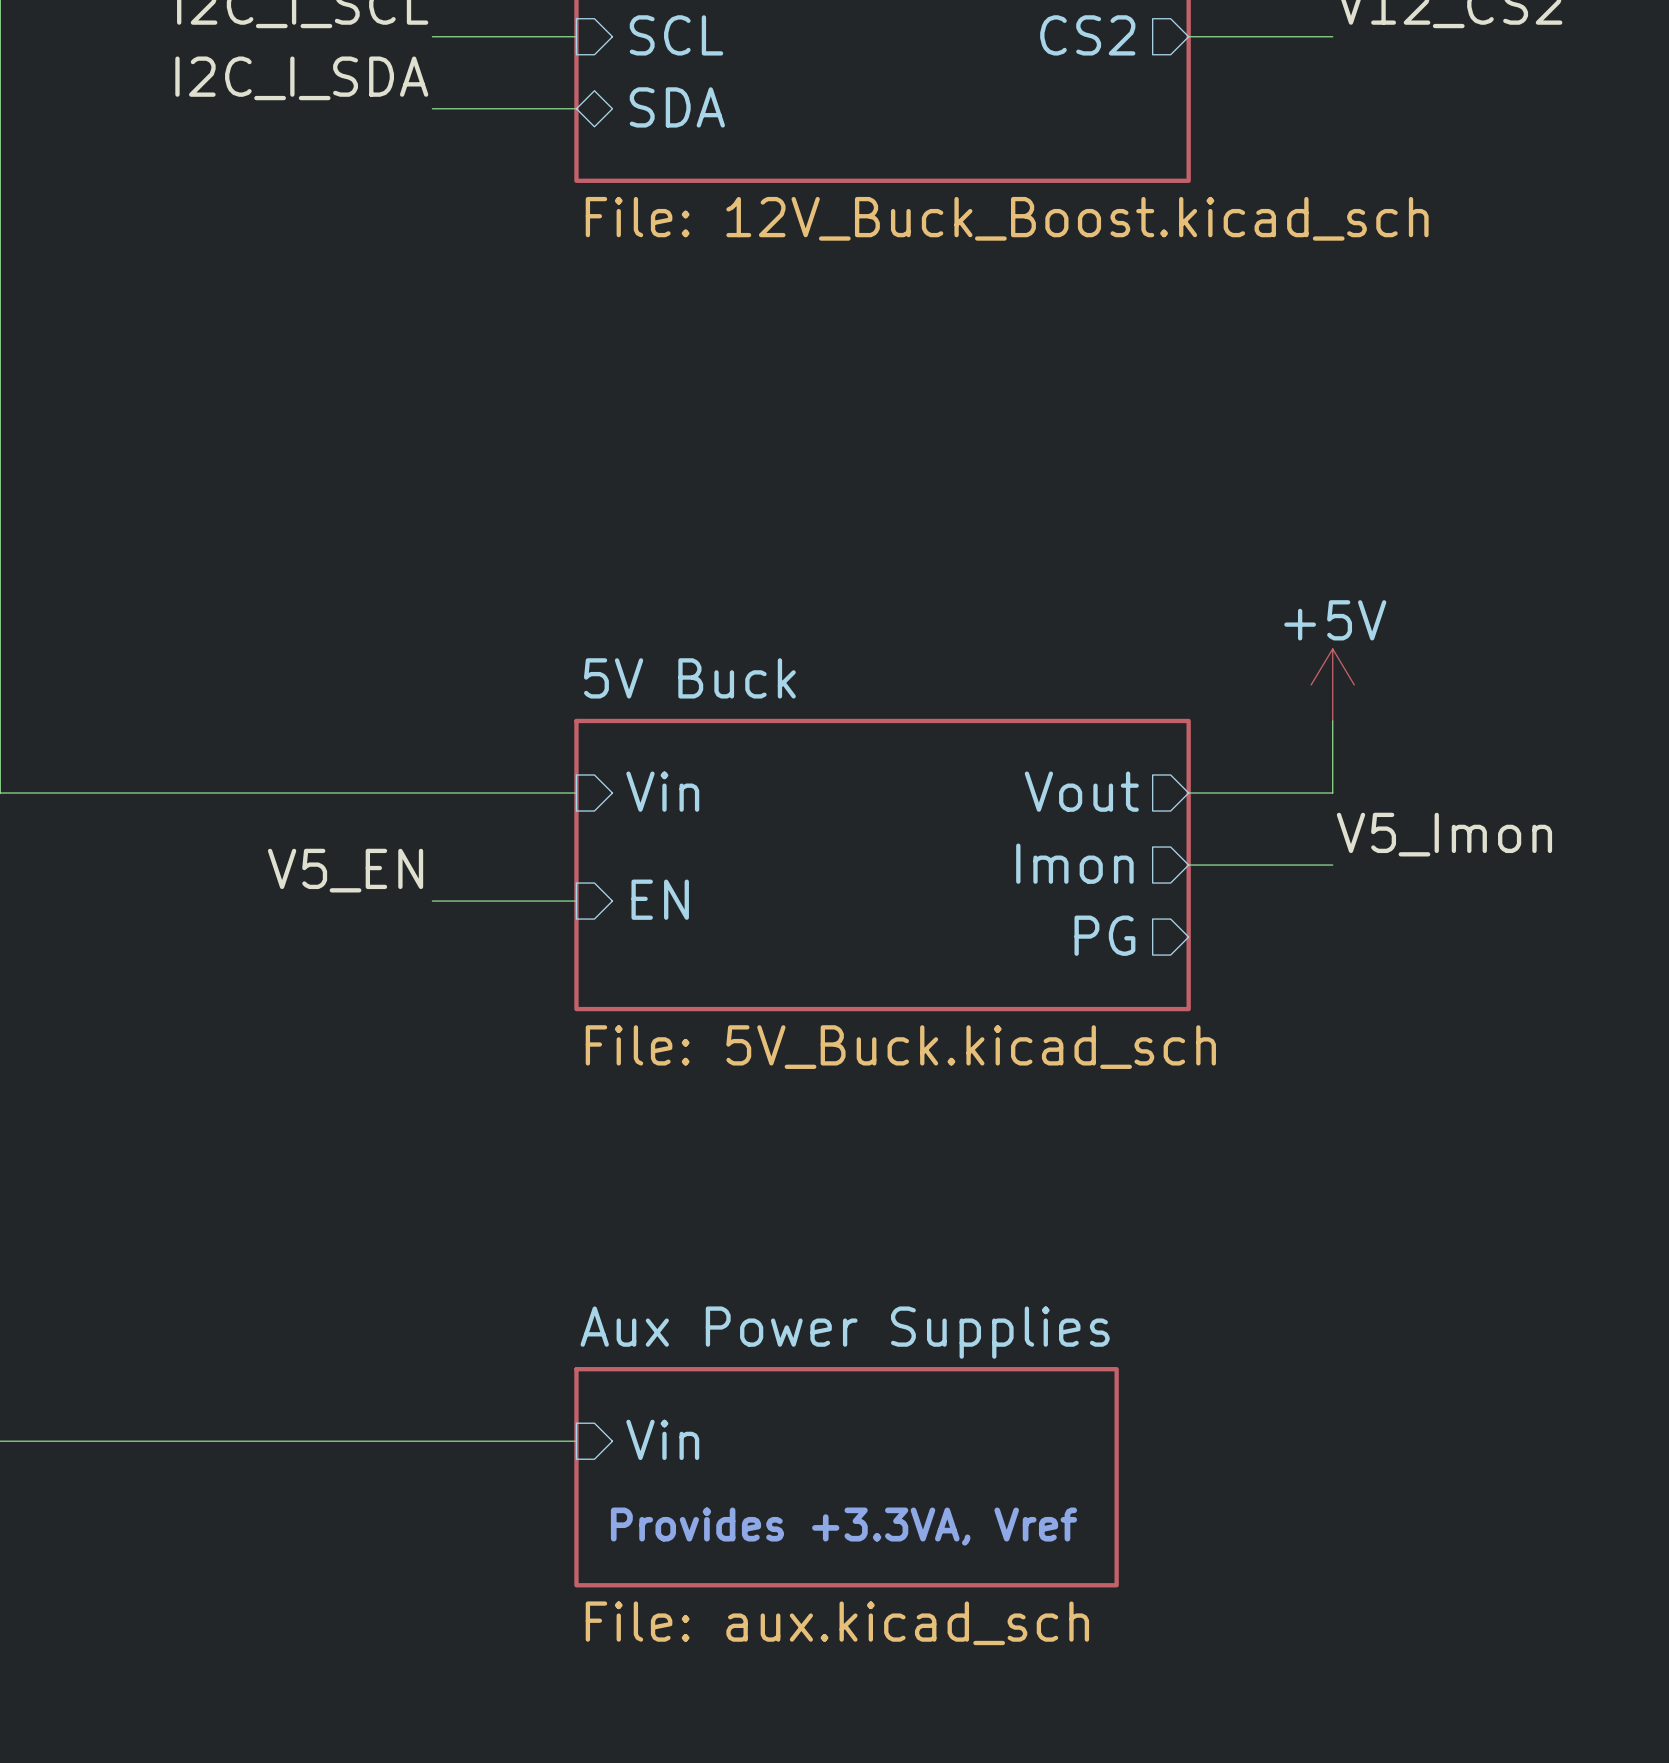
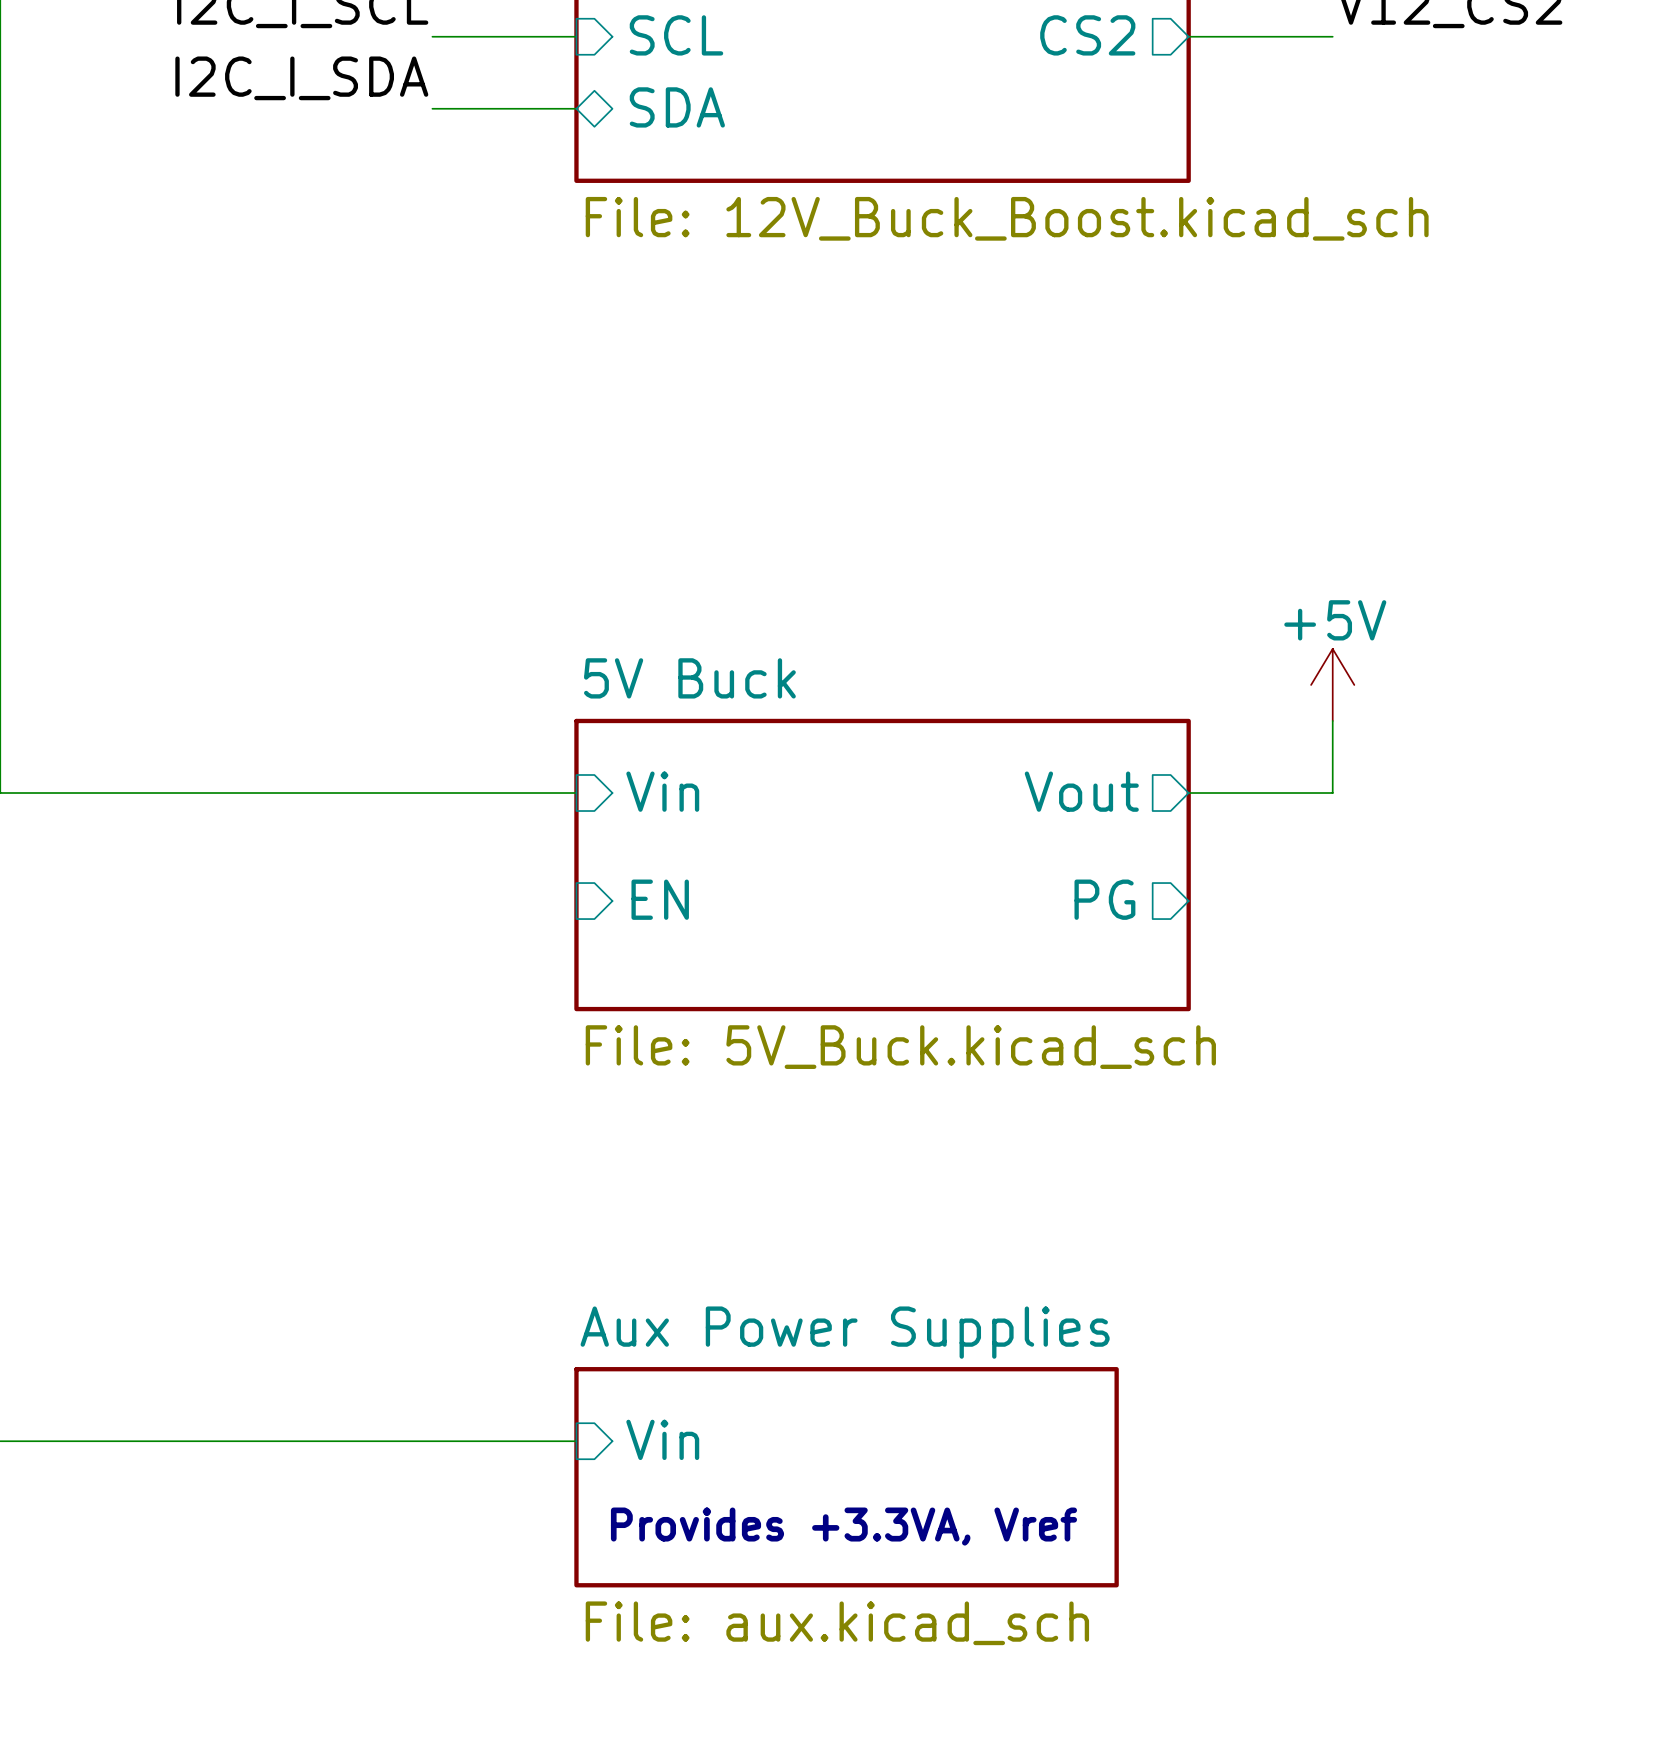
label: V5_Imon (1444, 834) -> none
sheet pin: Imon (1074, 863) -> none
wire: (1188, 865) (1332, 865) -> none
label: V5_EN (345, 870) -> none
wire: (432, 901) (576, 901) -> none
sheet pin position: PG (1104, 935) -> PG (1104, 899)

